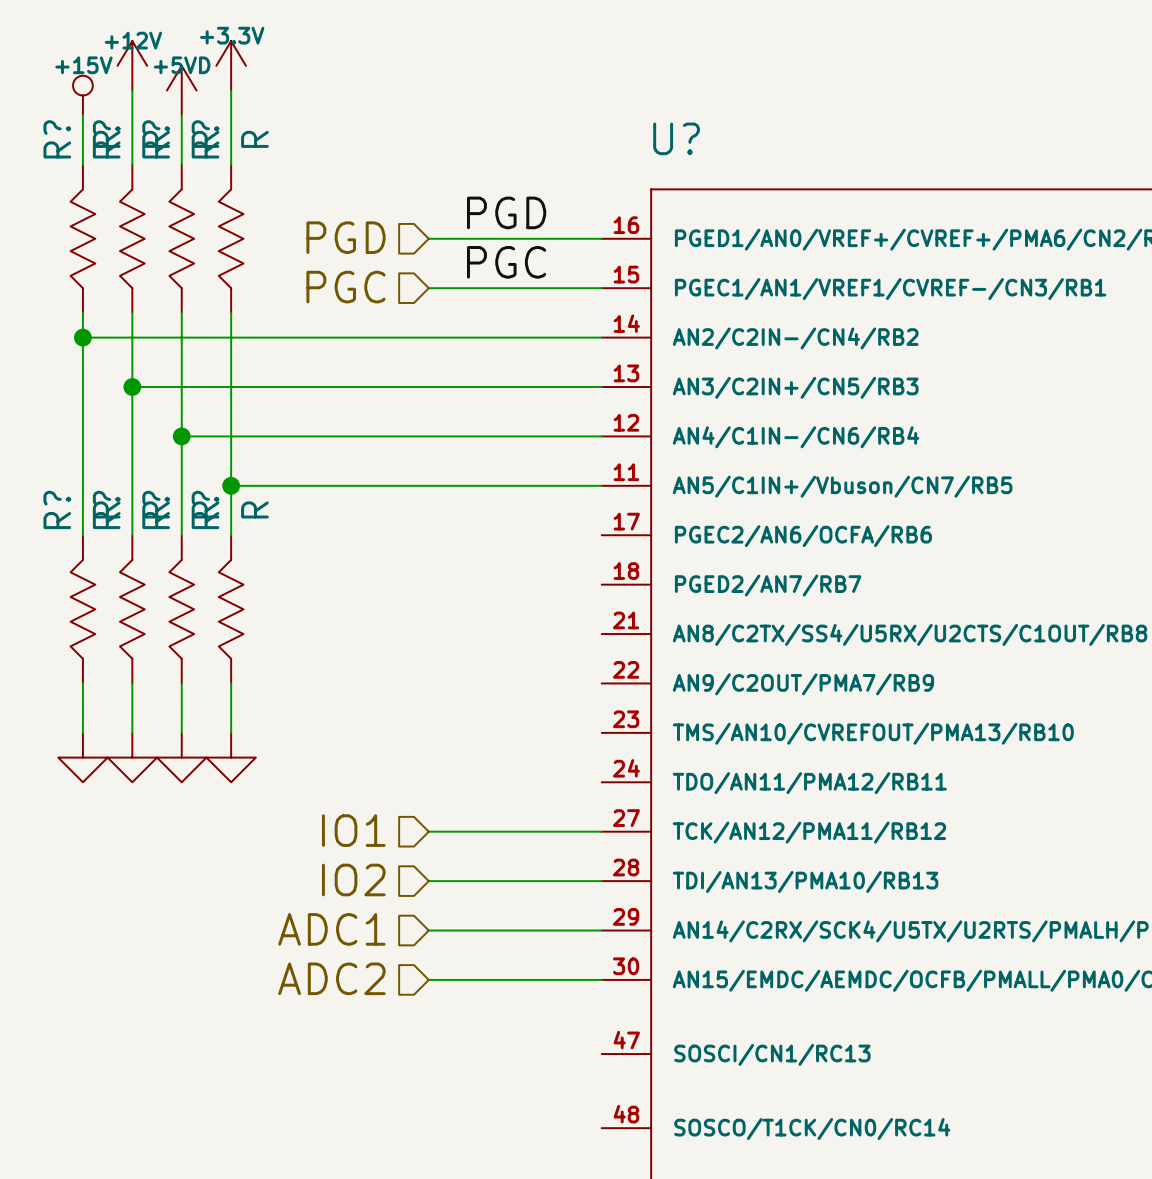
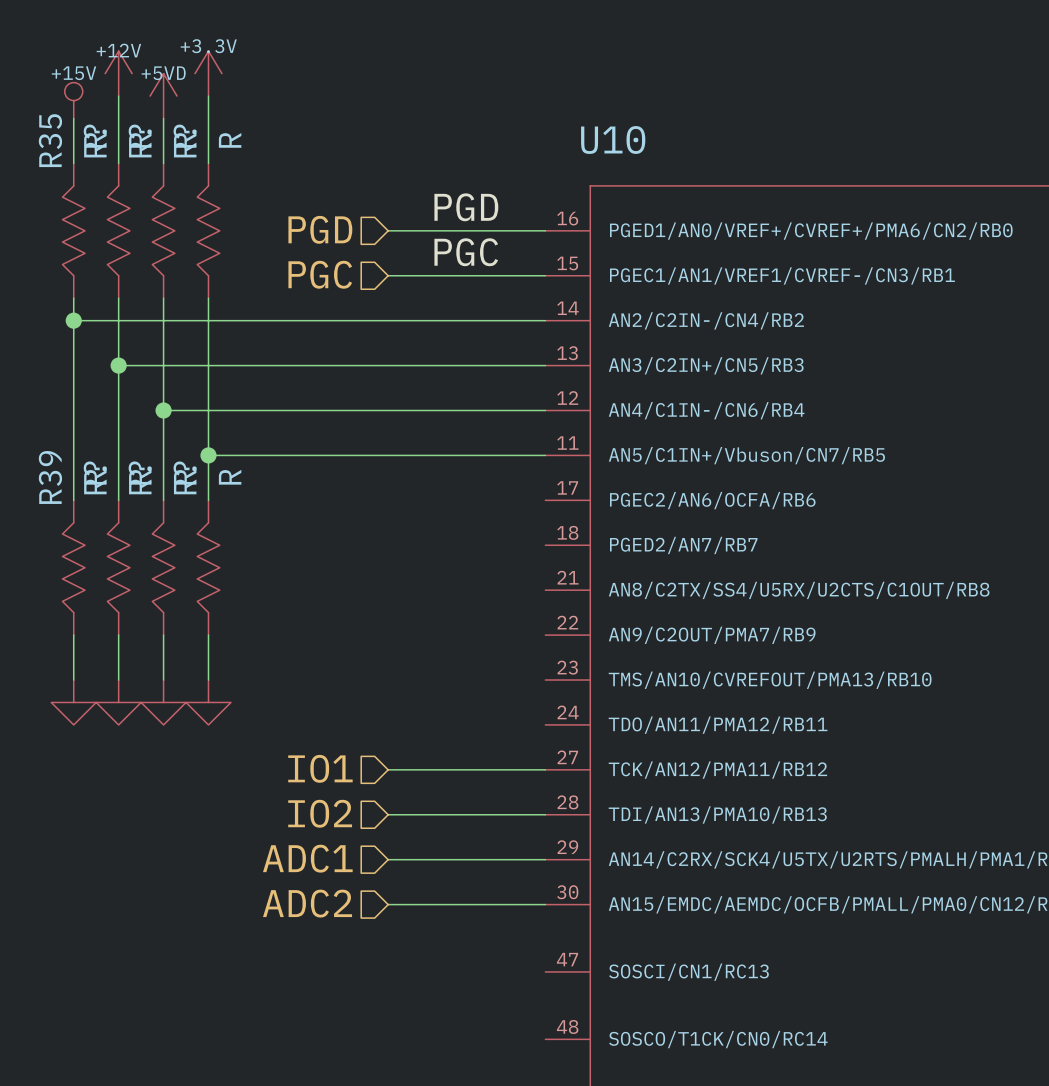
U? name: U? (676, 138) -> U10 (613, 139)
R? name: R? (57, 139) -> R35 (50, 140)
R? name: R? (57, 509) -> R39 (50, 477)

